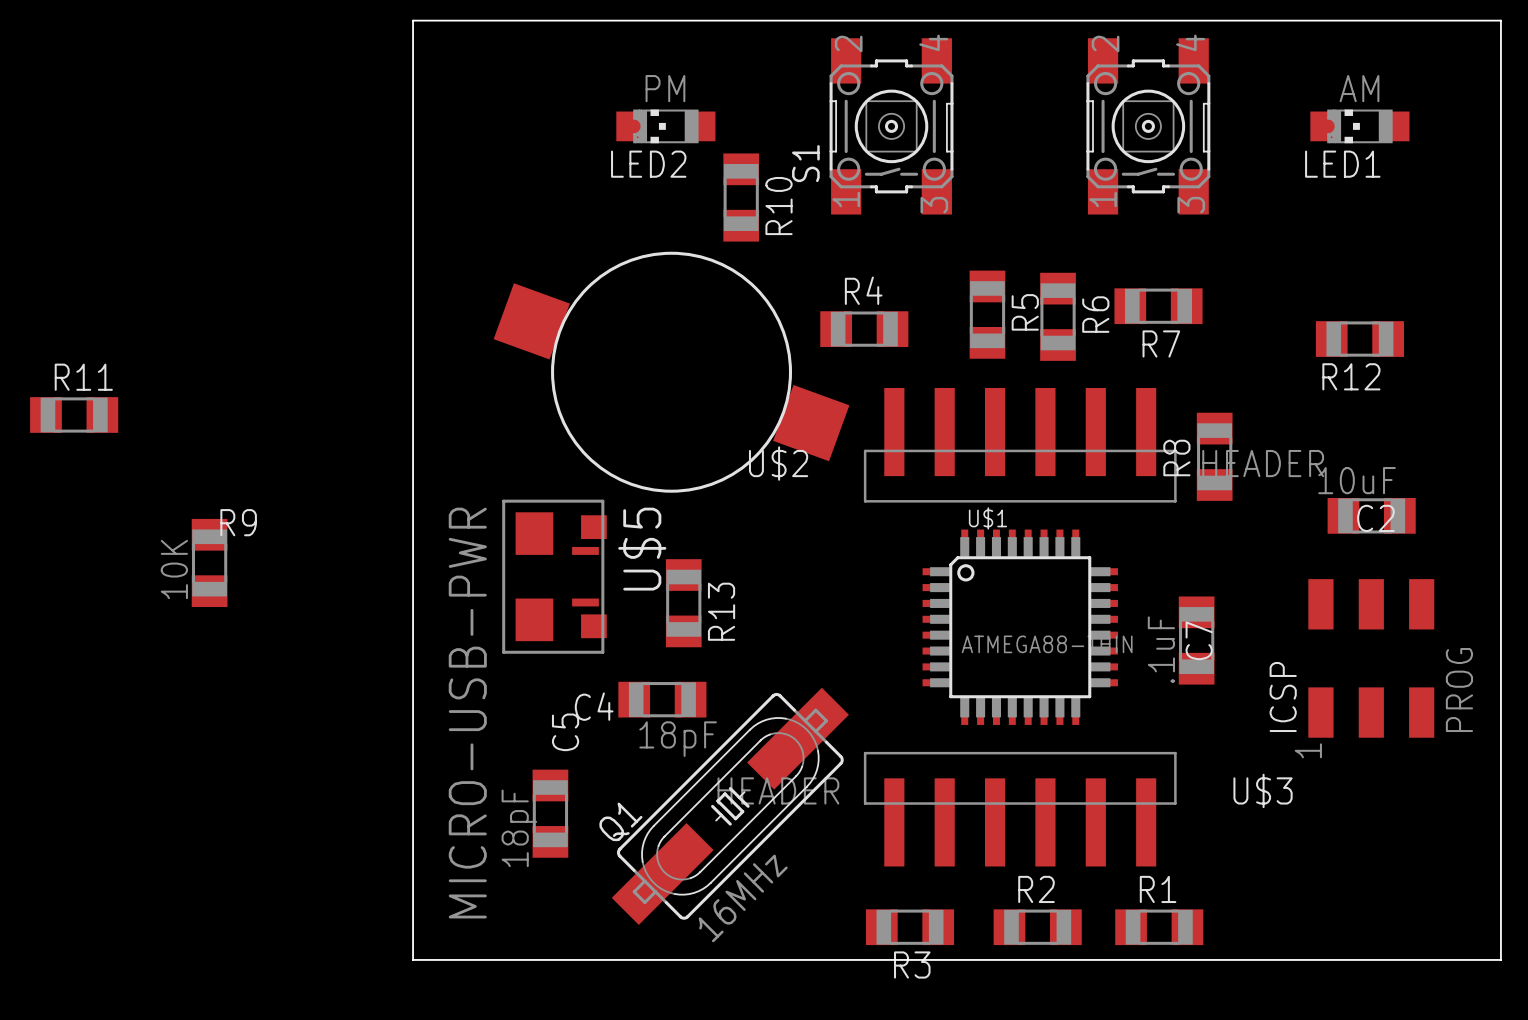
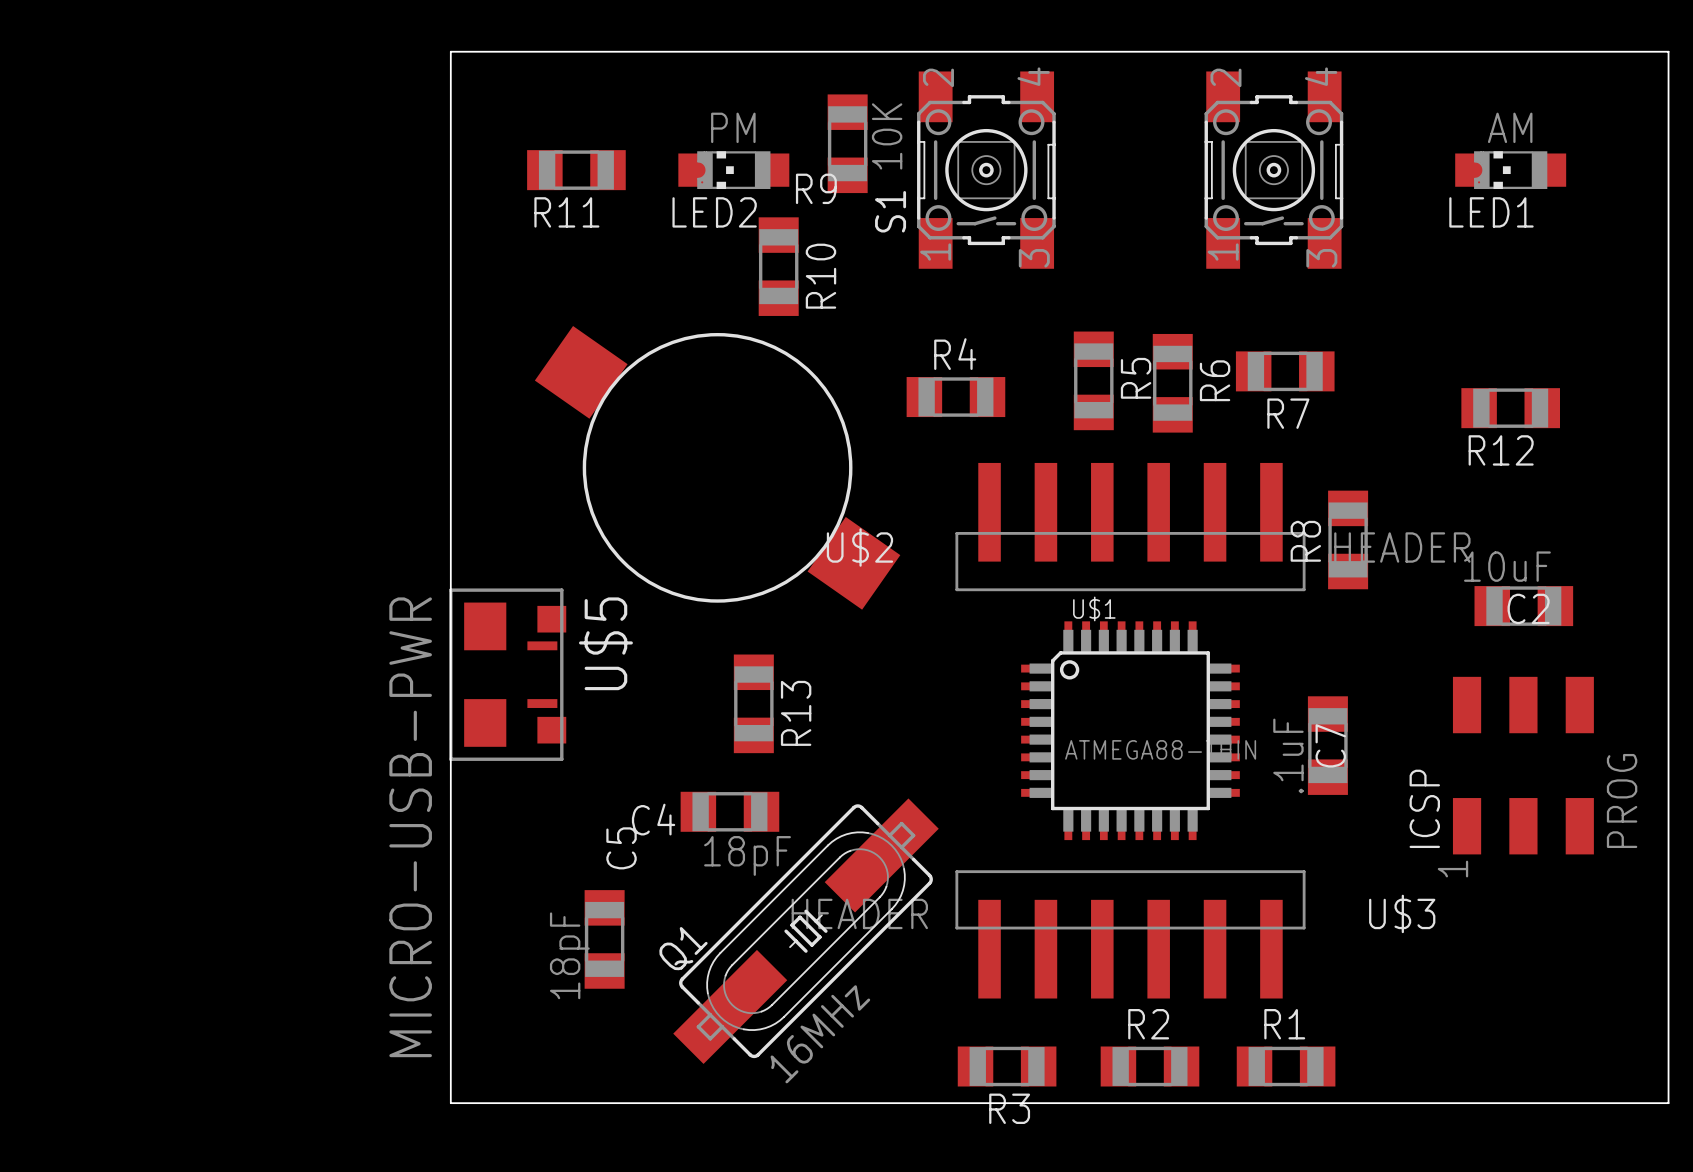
R10 position: (741, 197) -> (778, 266)
part: (671, 372) -> none
R11 name position: R11 (83, 377) -> R11 (566, 212)
part: none -> (717, 467)
R11 position: (74, 414) -> (576, 170)
R9 name position: R9 (238, 522) -> R9 (816, 188)
R9 position: (209, 562) -> (847, 143)
R9 value position: 10K (174, 569) -> 10K (887, 136)
U$5 position: (554, 576) -> (507, 674)

